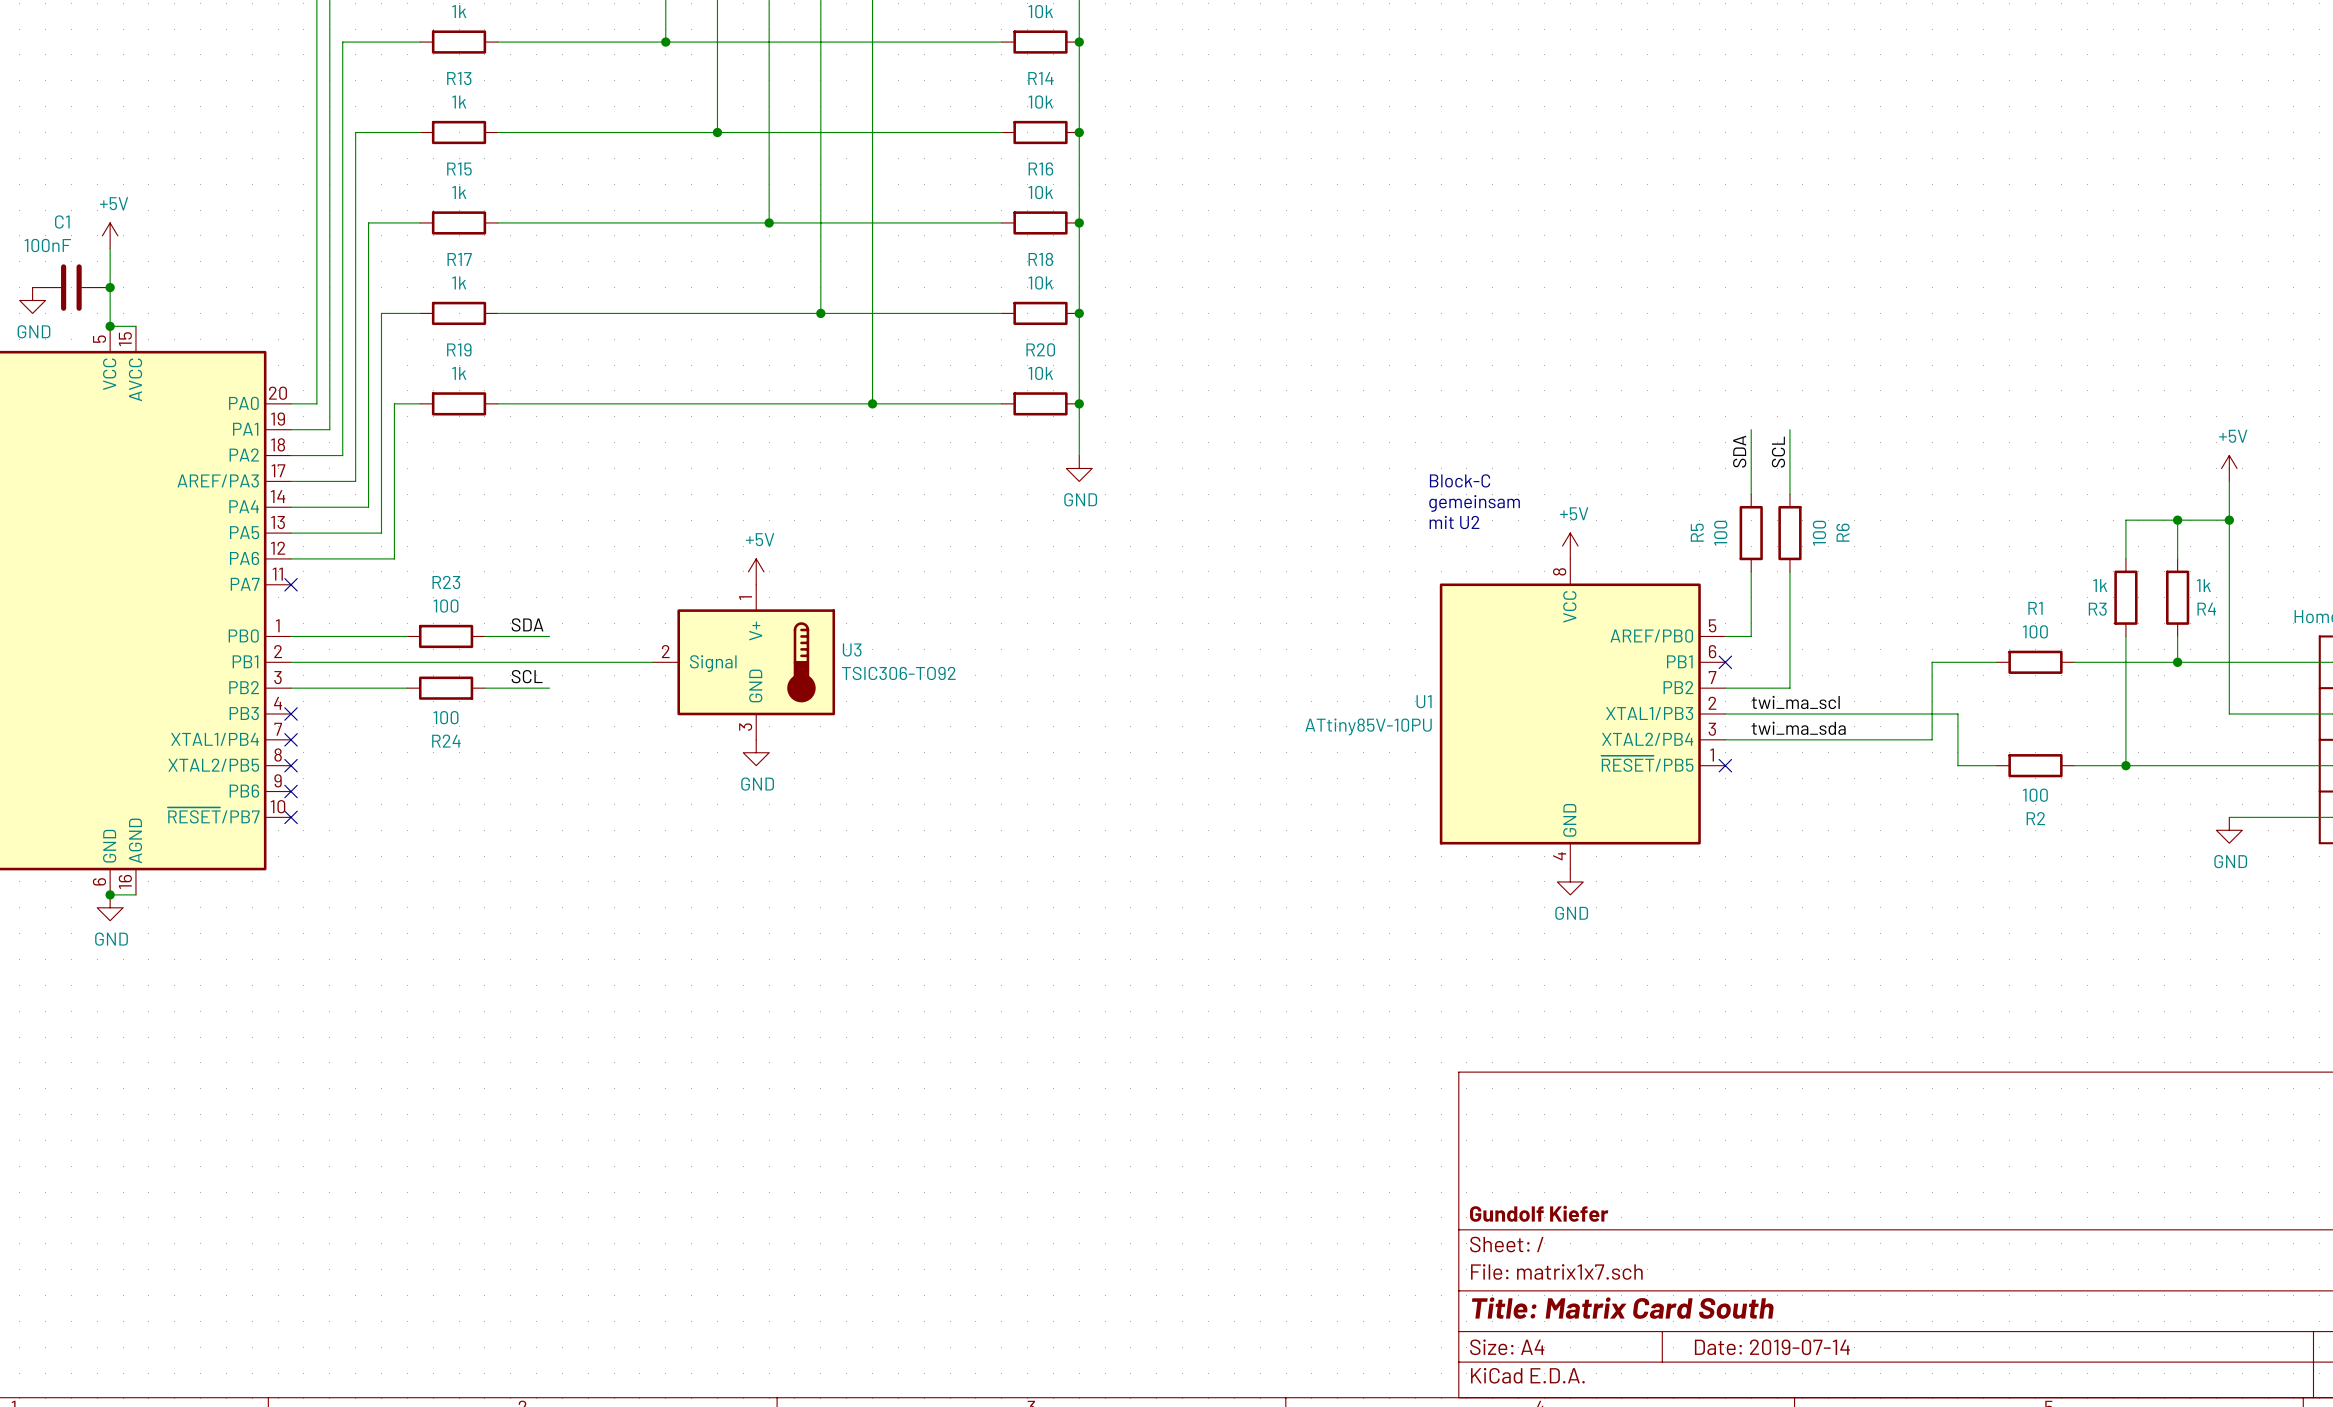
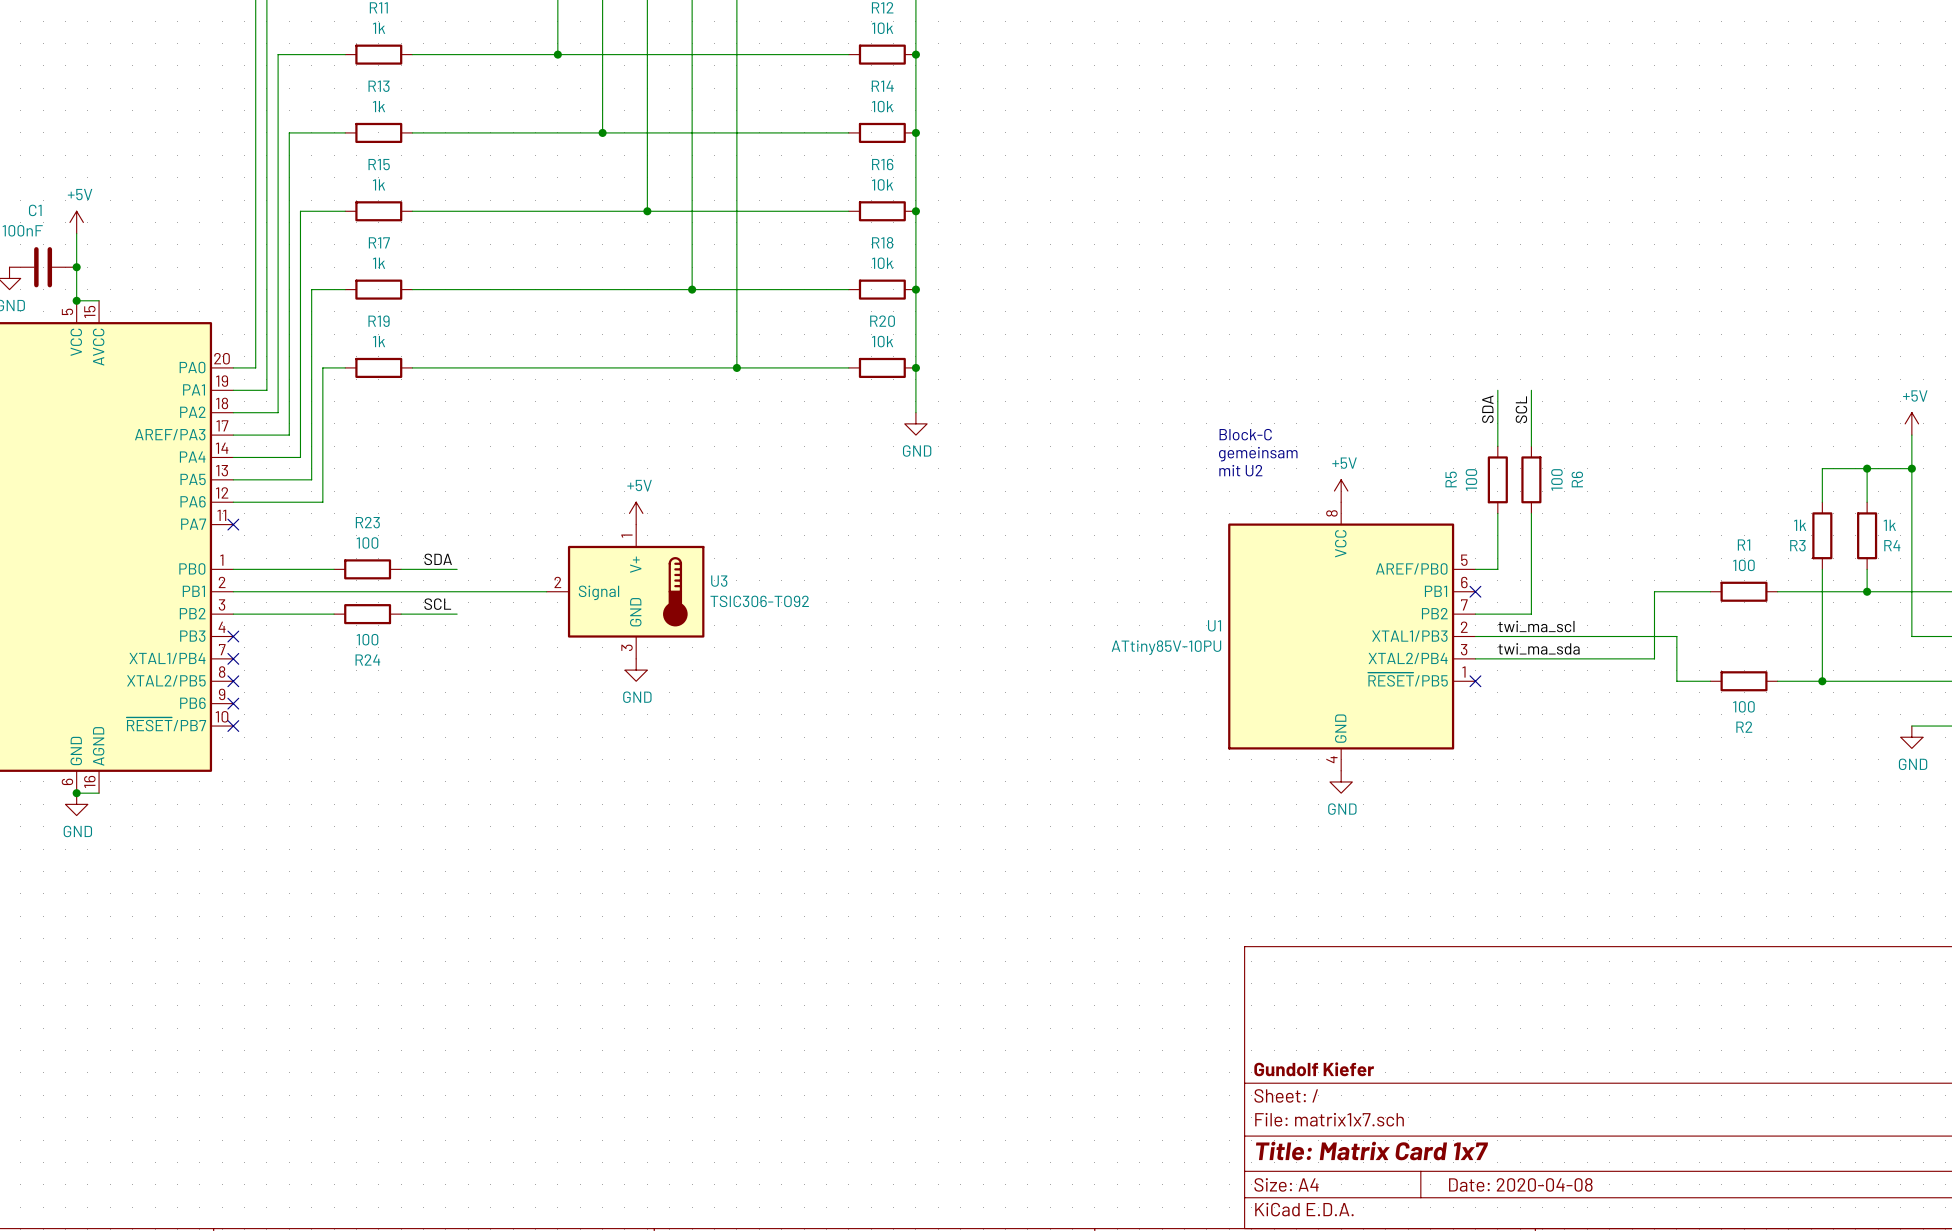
title block: Title: Matrix Card South (1622, 1308) -> Title: Matrix Card 1x7 (1371, 1151)
title block: Date: 2019-07-14 (1772, 1347) -> Date: 2020-04-08 (1520, 1184)

